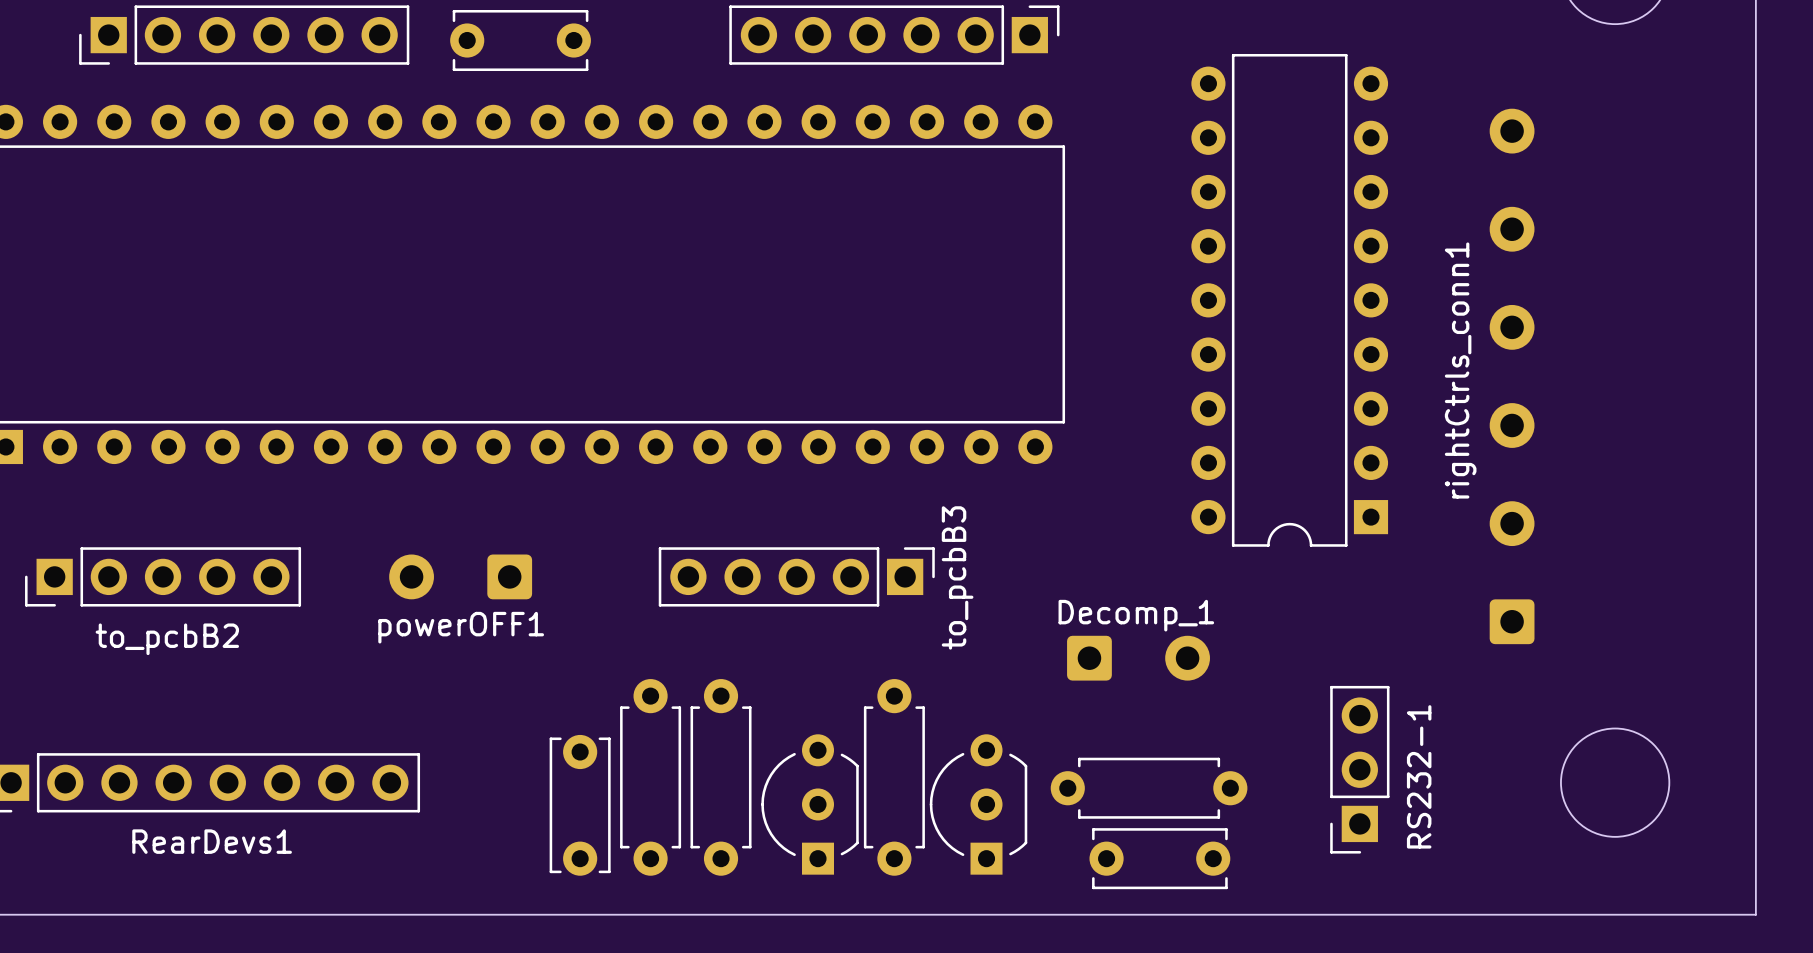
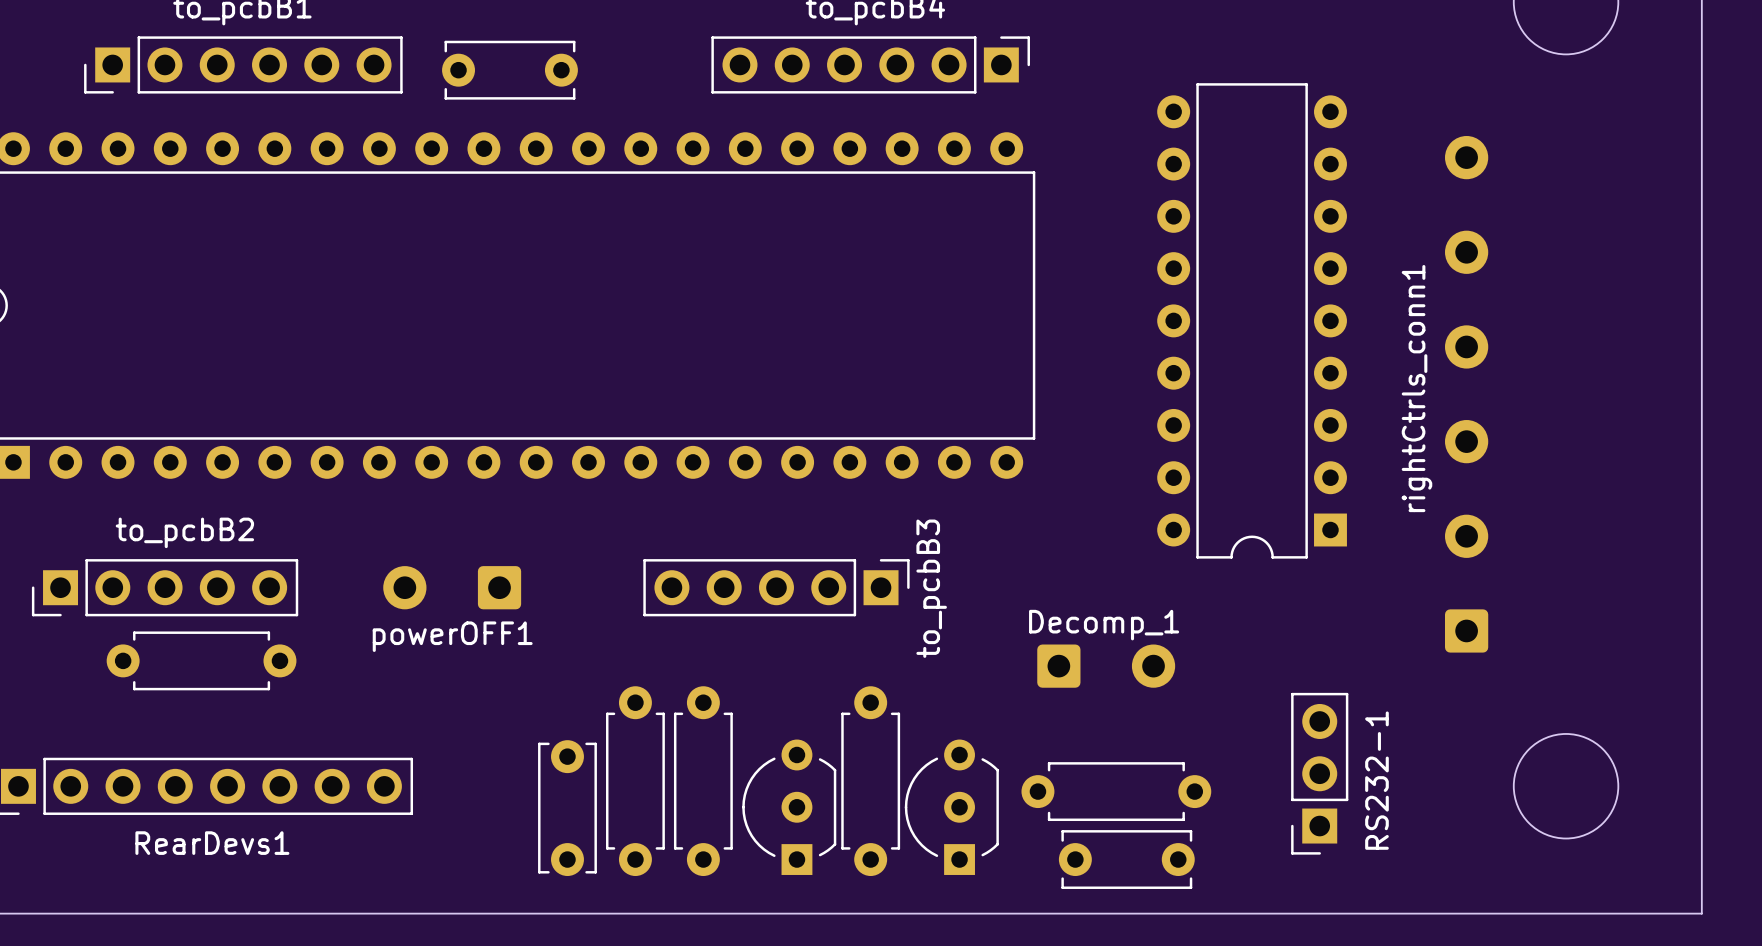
to_pcbB2 name position: to_pcbB2 (167, 639) -> to_pcbB2 (184, 532)
part: none -> (201, 660)

